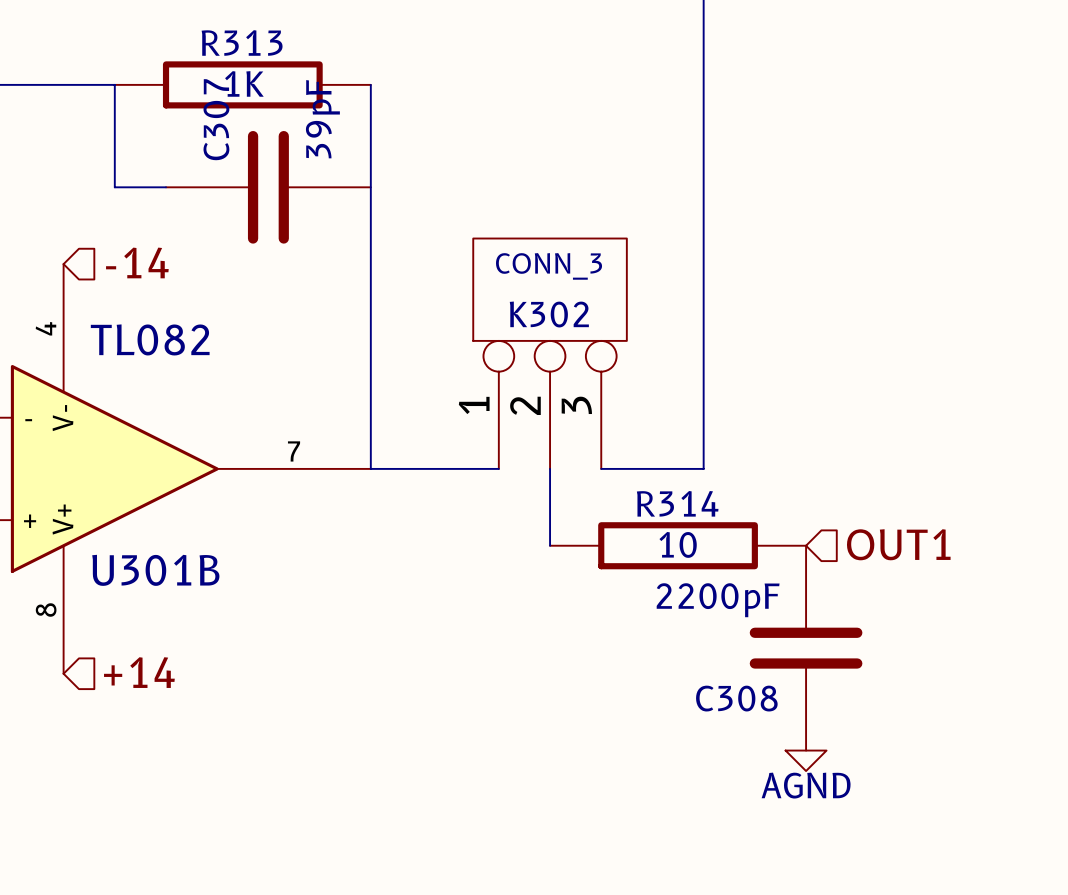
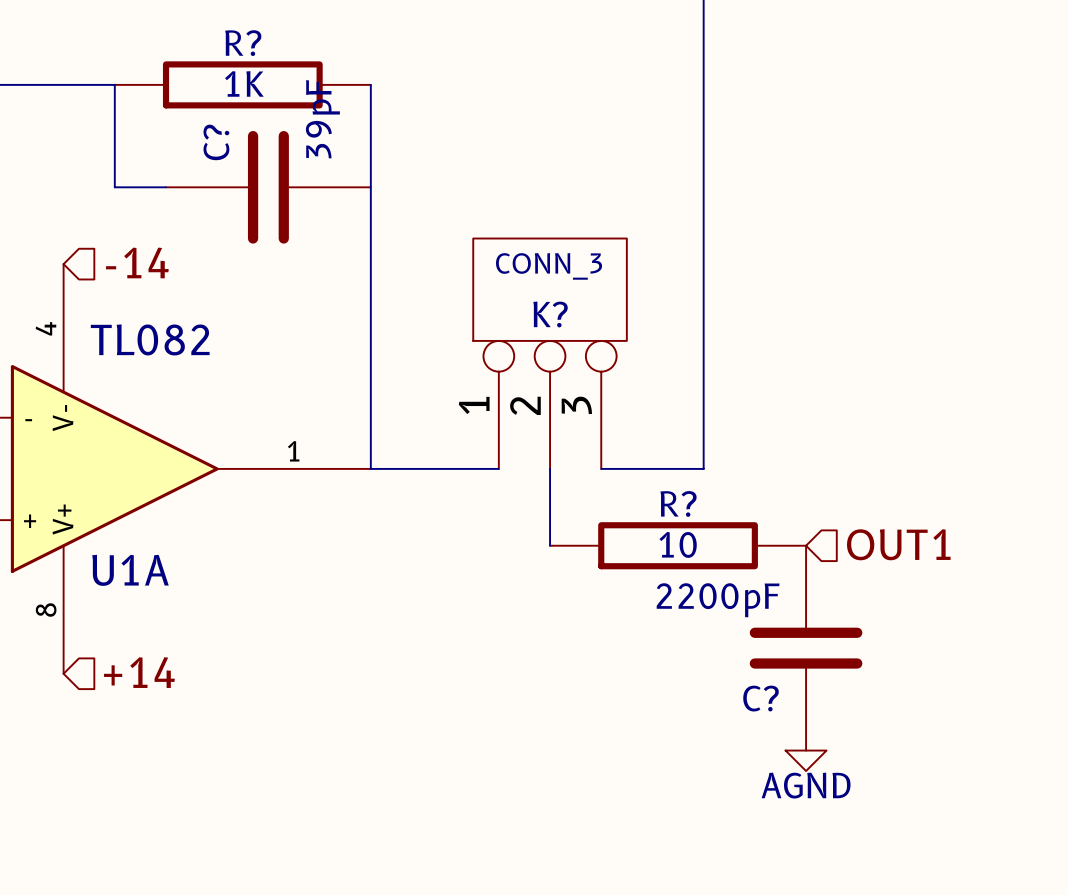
R313 name: R313 (242, 42) -> R? (243, 43)
C307 name: C307 (216, 119) -> C? (216, 142)
K302 name: K302 (549, 314) -> K? (550, 314)
U301B pin number: 7 (294, 451) -> 1 (293, 451)
R314 name: R314 (677, 503) -> R? (678, 503)
U301B name: U301B (155, 570) -> U1A (130, 570)
C308 name: C308 (736, 698) -> C? (761, 698)

